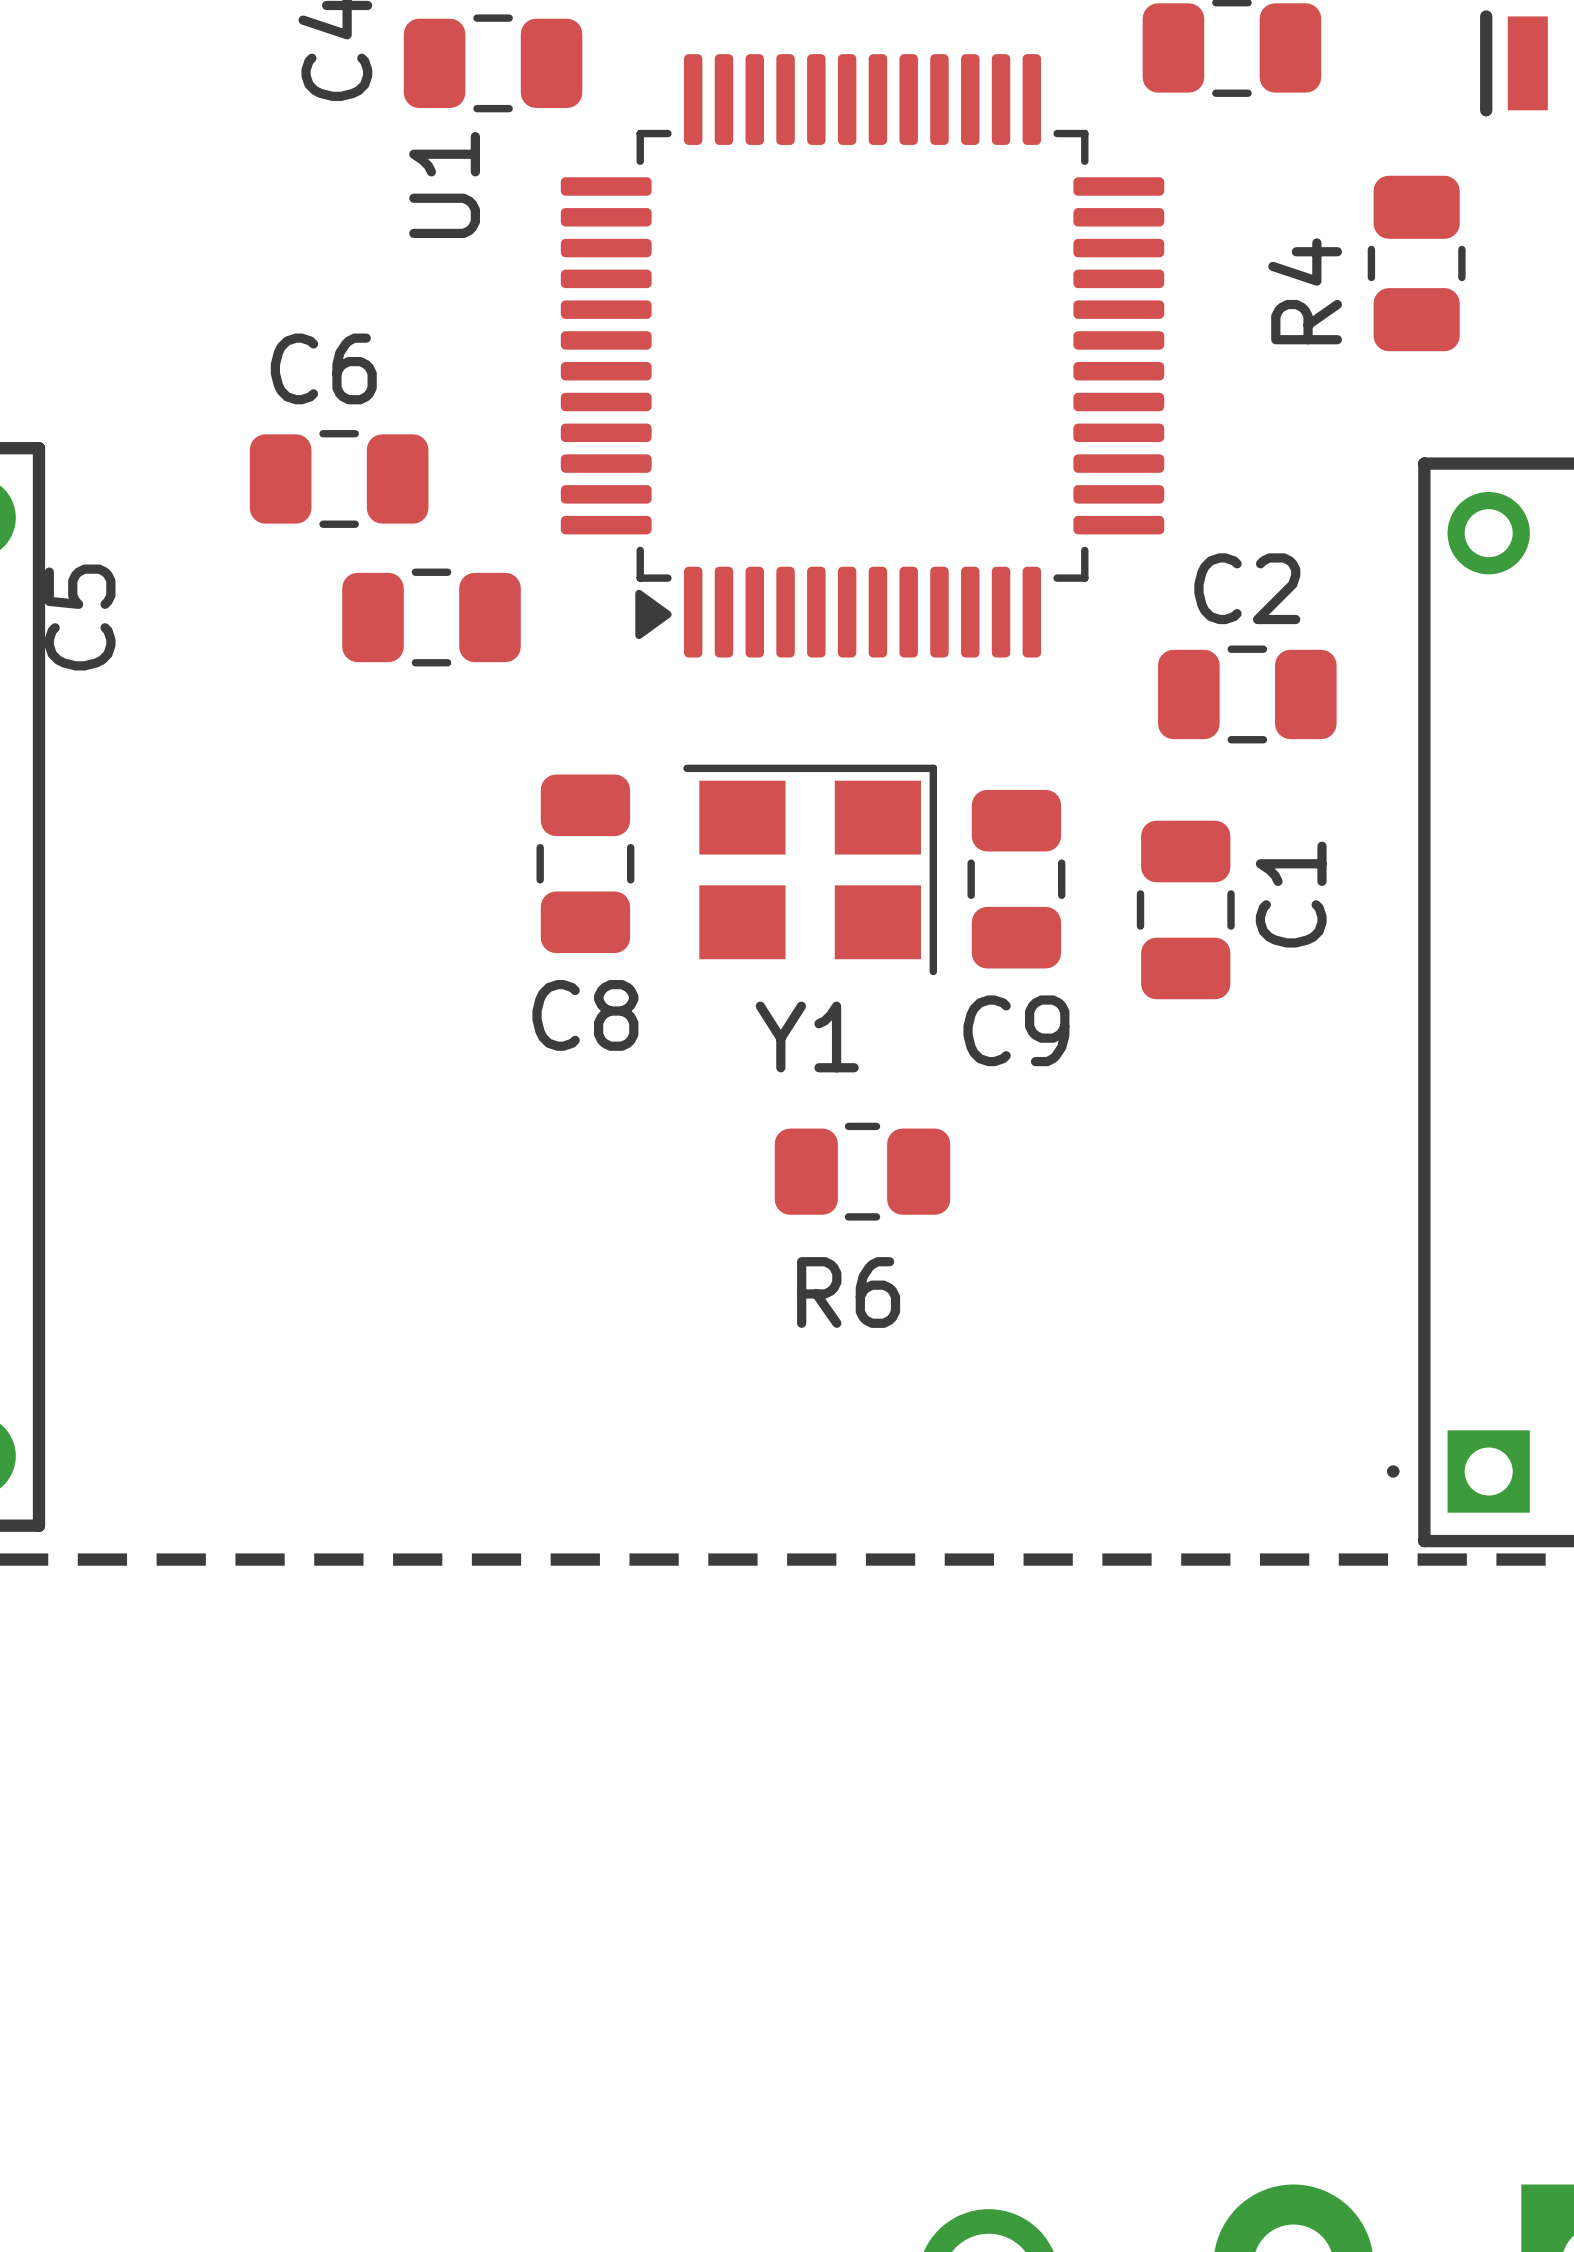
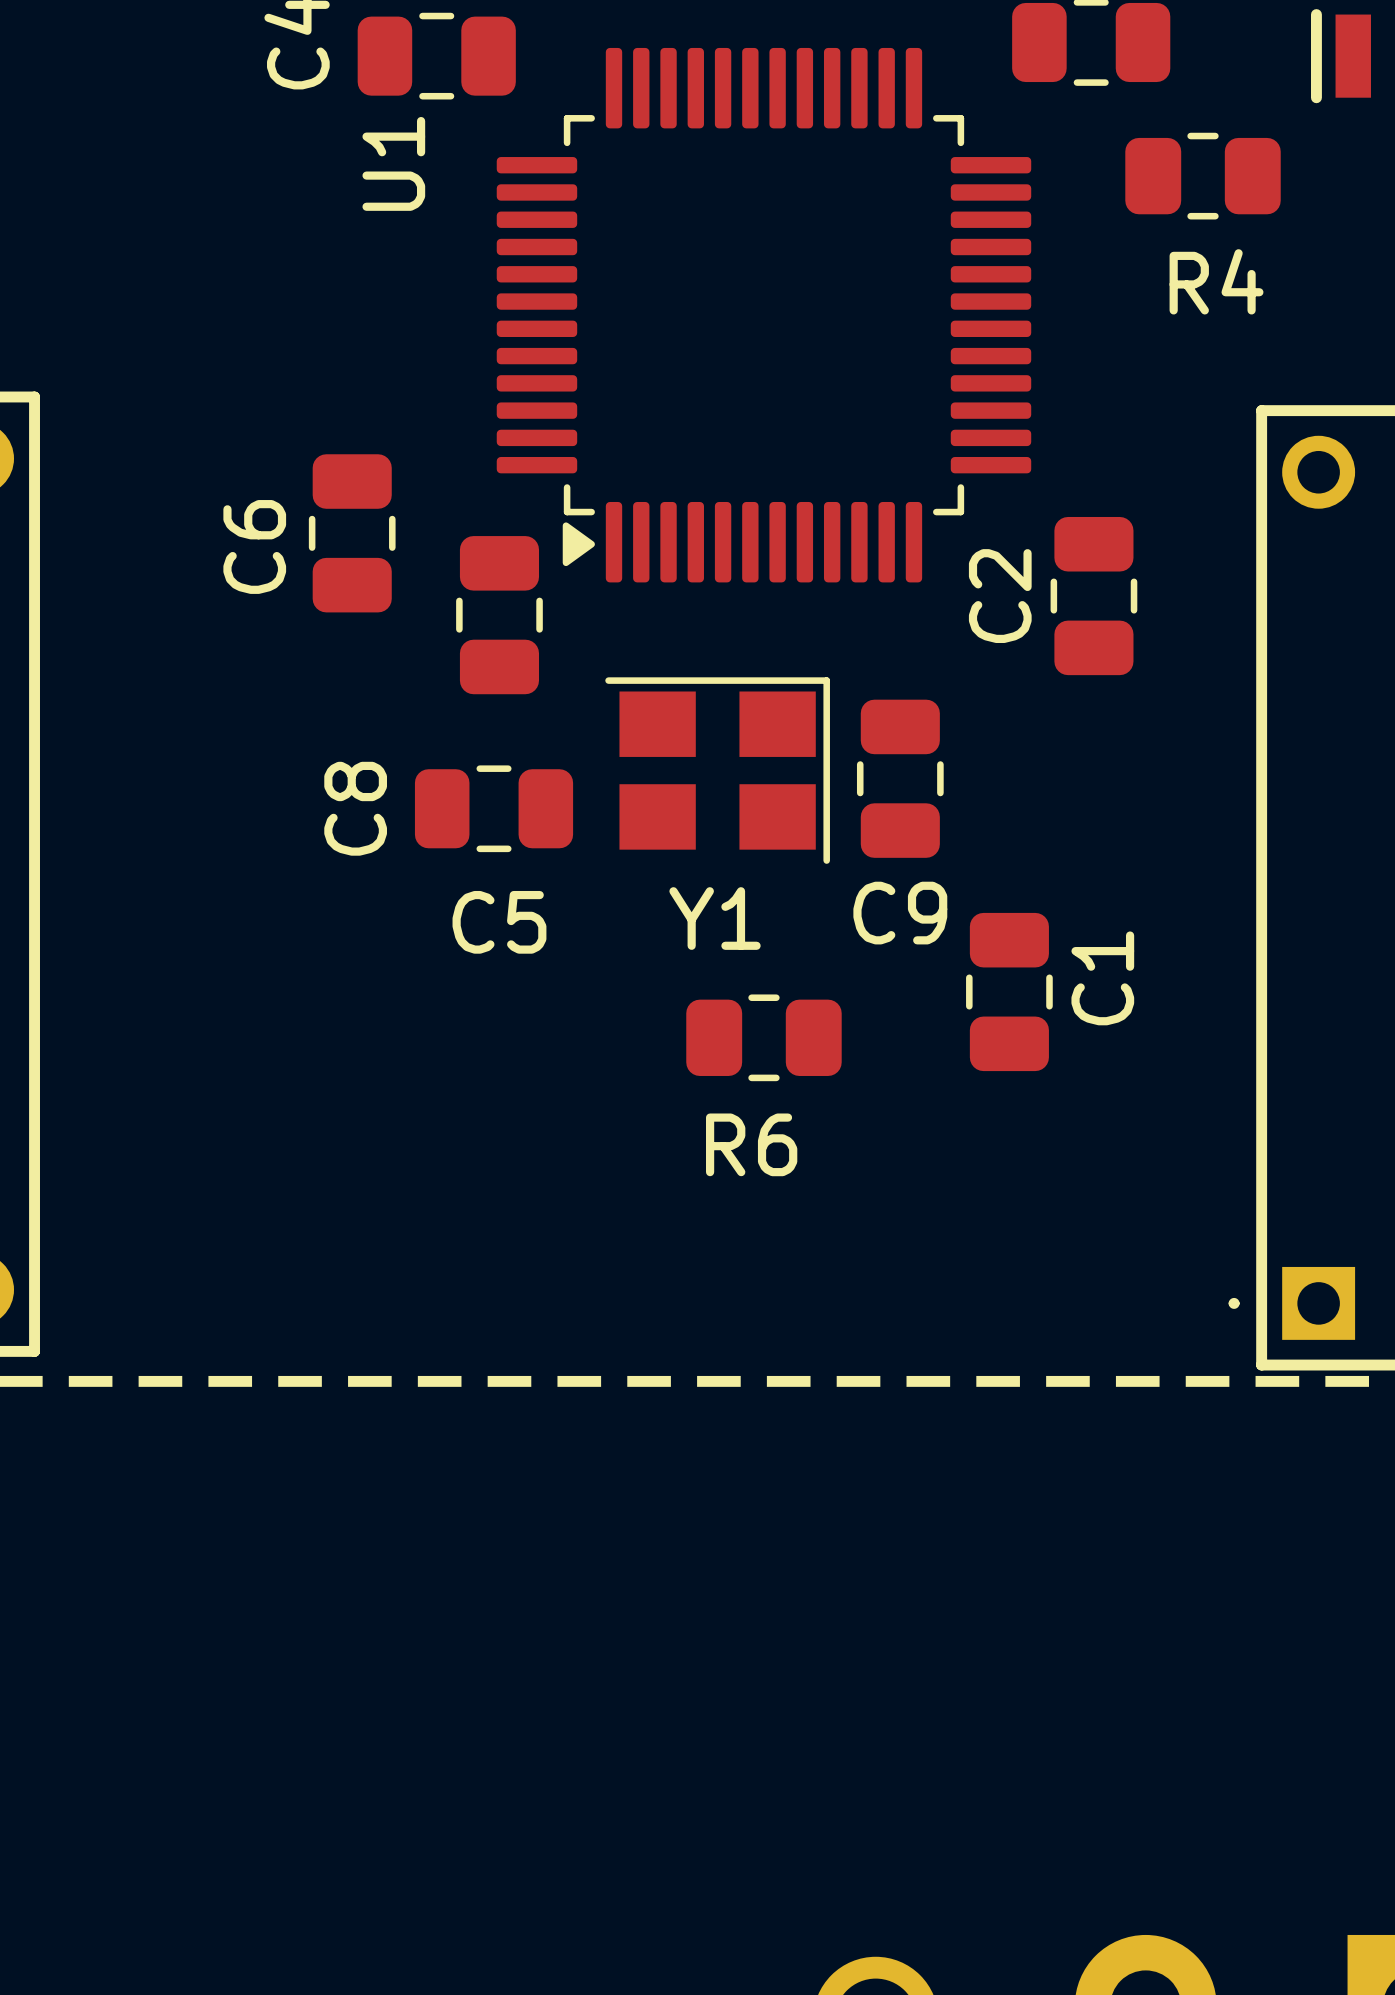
R4 rotation: 0° (1416, 263) -> 90° clockwise (1203, 176)
R4 name position: R4 (1305, 291) -> R4 (1216, 281)
C6 name position: C6 (323, 368) -> C6 (254, 546)
C6 rotation: 0° (339, 478) -> 90° clockwise (352, 533)
C6 position: (339, 478) -> (352, 533)
C2 name position: C2 (1247, 588) -> C2 (1000, 596)
C5 name position: C5 (80, 617) -> C5 (499, 922)
C5 rotation: 0° (431, 617) -> 90° clockwise (499, 615)
C5 position: (431, 617) -> (499, 615)
C2 rotation: 0° (1247, 694) -> 90° clockwise (1093, 596)
C8 rotation: 0° (585, 863) -> 90° clockwise (494, 808)
C1 position: (1185, 909) -> (1009, 992)

